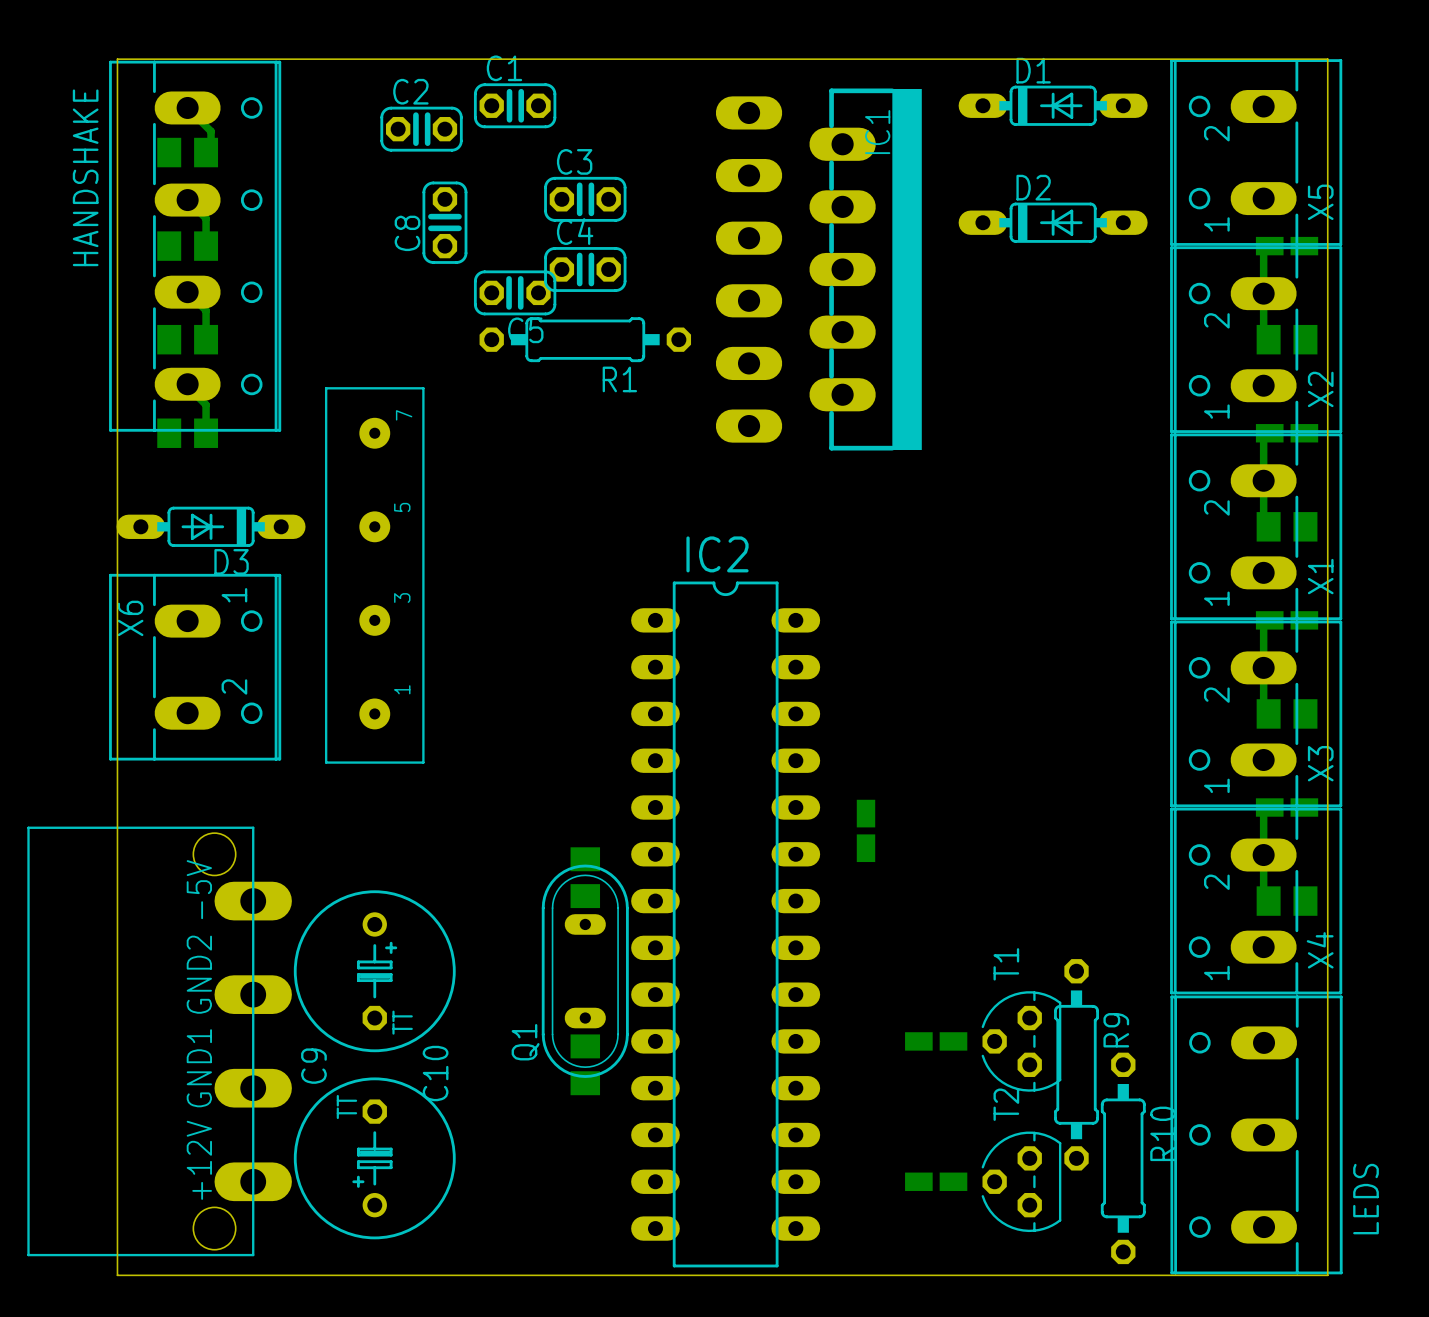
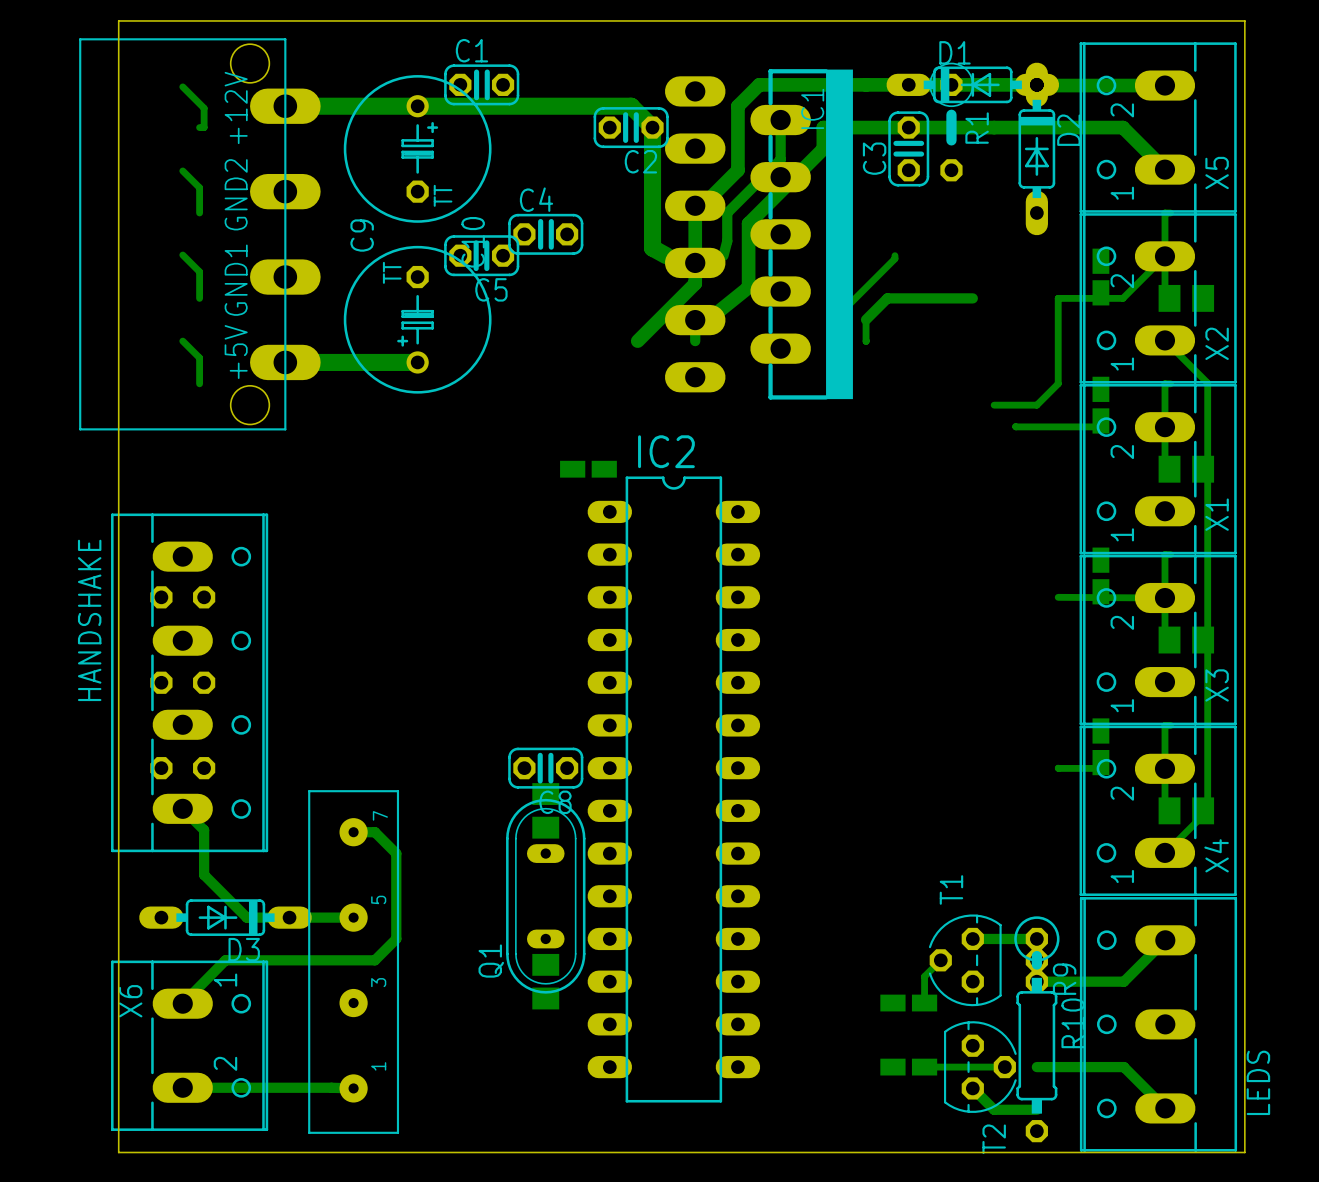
board edge: (117, 59) (1327, 59) (1327, 1275) -> (118, 42) (118, 20) (1244, 20) (1244, 1152) (1223, 1152)
bottom track: none -> (1164, 85) (759, 84) (737, 106) (737, 170) (695, 212) (695, 283) (637, 341)
bottom track: none -> (285, 106) (631, 106) (652, 127) (652, 248) (666, 255)
C2 rotation: 0° (421, 129) -> 180° (631, 127)
C2 position: (421, 129) -> (631, 127)
part: (187, 152) -> none
bottom track: none -> (780, 127) (780, 159) (727, 212) (727, 241) (723, 255)
bottom track: none -> (1164, 169) (1122, 127) (823, 127) (823, 148) (748, 223) (748, 287) (695, 330) (695, 341)
C3 rotation: 0° (585, 199) -> 90° counterclockwise (908, 148)
C3 position: (585, 199) -> (908, 148)
C8 rotation: 0° (444, 222) -> 90° counterclockwise (545, 768)
C8 position: (444, 222) -> (545, 768)
D2 rotation: 0° (1053, 222) -> 90° clockwise (1036, 148)
part: (187, 246) -> none
HANDSHAKE: (195, 246) -> none
part: (1287, 246) -> none
part: none -> (199, 234)
bottom track: none -> (894, 255) (894, 258) (834, 319) (834, 383)
bottom track: none -> (1164, 256) (1122, 298) (1058, 298) (1058, 383) (1036, 405) (994, 405)
part: none -> (1100, 277)
R1 footprint: [479, 317, 692, 363] -> [929, 62, 974, 182]
part: (187, 339) -> none
bottom track: none -> (972, 298) (887, 298) (866, 319) (866, 341)
bottom track: none -> (1164, 340) (1207, 383) (1207, 810) (1164, 852)
bottom track: none -> (285, 362) (417, 362)
part: (187, 433) -> none
part: (1287, 433) -> none
part: none -> (1100, 405)
bottom track: none -> (1100, 420) (1100, 426) (1015, 426)
D3 position: (211, 526) -> (225, 917)
part: none -> (588, 469)
part: (374, 575) -> none
part: (1287, 620) -> none
part: none -> (1100, 575)
part: none -> (182, 597)
X6 position: (195, 667) -> (189, 1045)
bottom track: none -> (1058, 597) (1164, 598)
part: none -> (182, 682)
HANDSHAKE: none -> (189, 682)
part: (1287, 807) -> none
part: (865, 830) -> none
part: none -> (1100, 746)
bottom track: none -> (1100, 762) (1100, 768) (1058, 768)
part: none -> (182, 768)
part position: (585, 877) -> (545, 810)
bottom track: none -> (182, 808) (204, 830) (204, 874) (246, 917) (353, 917)
bottom track: none -> (353, 832) (374, 832) (396, 853) (396, 938) (374, 960) (225, 960) (182, 1003)
IC2 position: (725, 924) -> (673, 789)
R9 footprint: [1054, 959, 1099, 1171] -> [1014, 916, 1060, 993]
C10 position: (374, 971) -> (417, 148)
Q1 position: (585, 971) -> (545, 896)
R9 name position: R9 (1116, 1030) -> R9 (1064, 979)
part: (159, 1041) -> none
part: (936, 1041) -> none
T1 position: (1021, 1041) -> (965, 960)
bottom track: none -> (972, 938) (1036, 938)
bottom track: none -> (1165, 940) (1123, 981) (1036, 981)
part position: (585, 1064) -> (545, 981)
bottom track: none -> (940, 960) (924, 976) (924, 1003)
part: none -> (353, 962)
part: none -> (908, 1003)
C9 position: (374, 1158) -> (417, 319)
part: (936, 1181) -> none
part: none -> (908, 1067)
bottom track: none -> (924, 1067) (1004, 1067)
T2 rotation: 0° (1021, 1181) -> 180° (980, 1067)
bottom track: none -> (1036, 1067) (1123, 1067) (1165, 1108)
bottom track: none -> (182, 1087) (353, 1088)
bottom track: none -> (972, 1088) (994, 1109) (1036, 1109)

